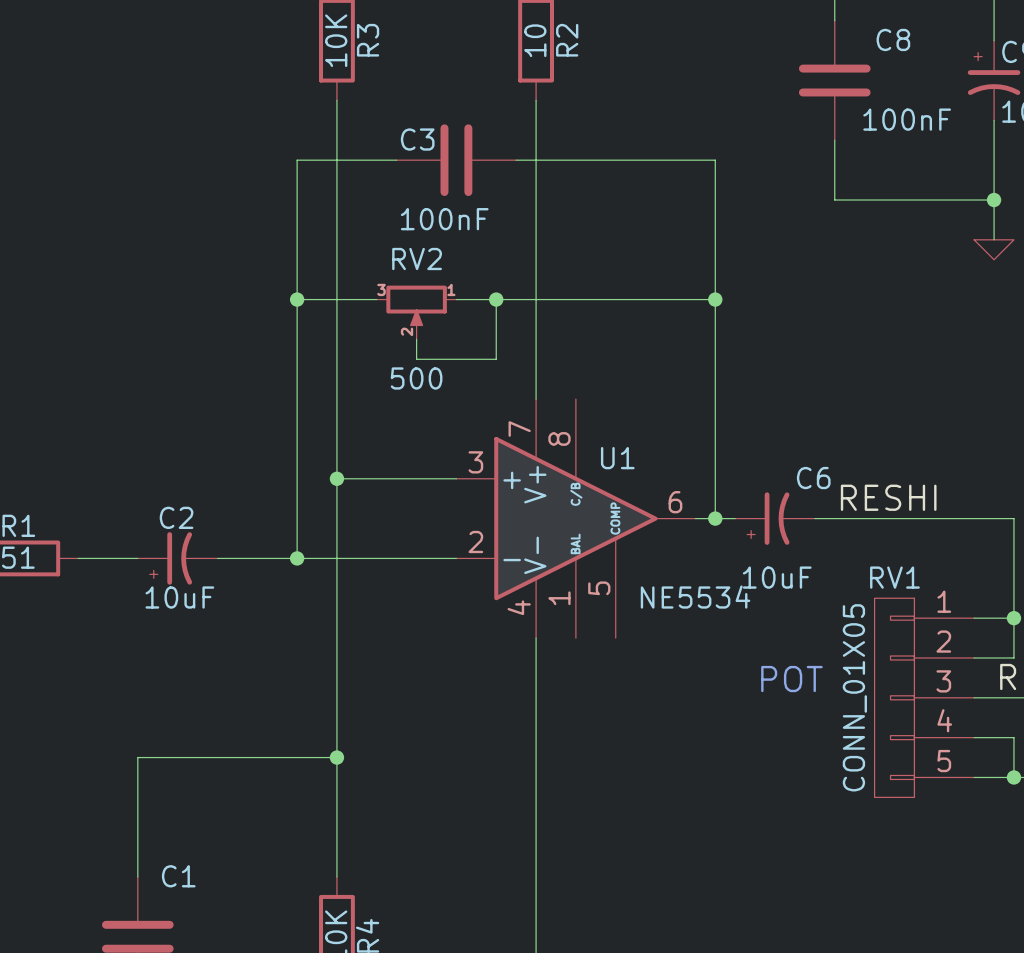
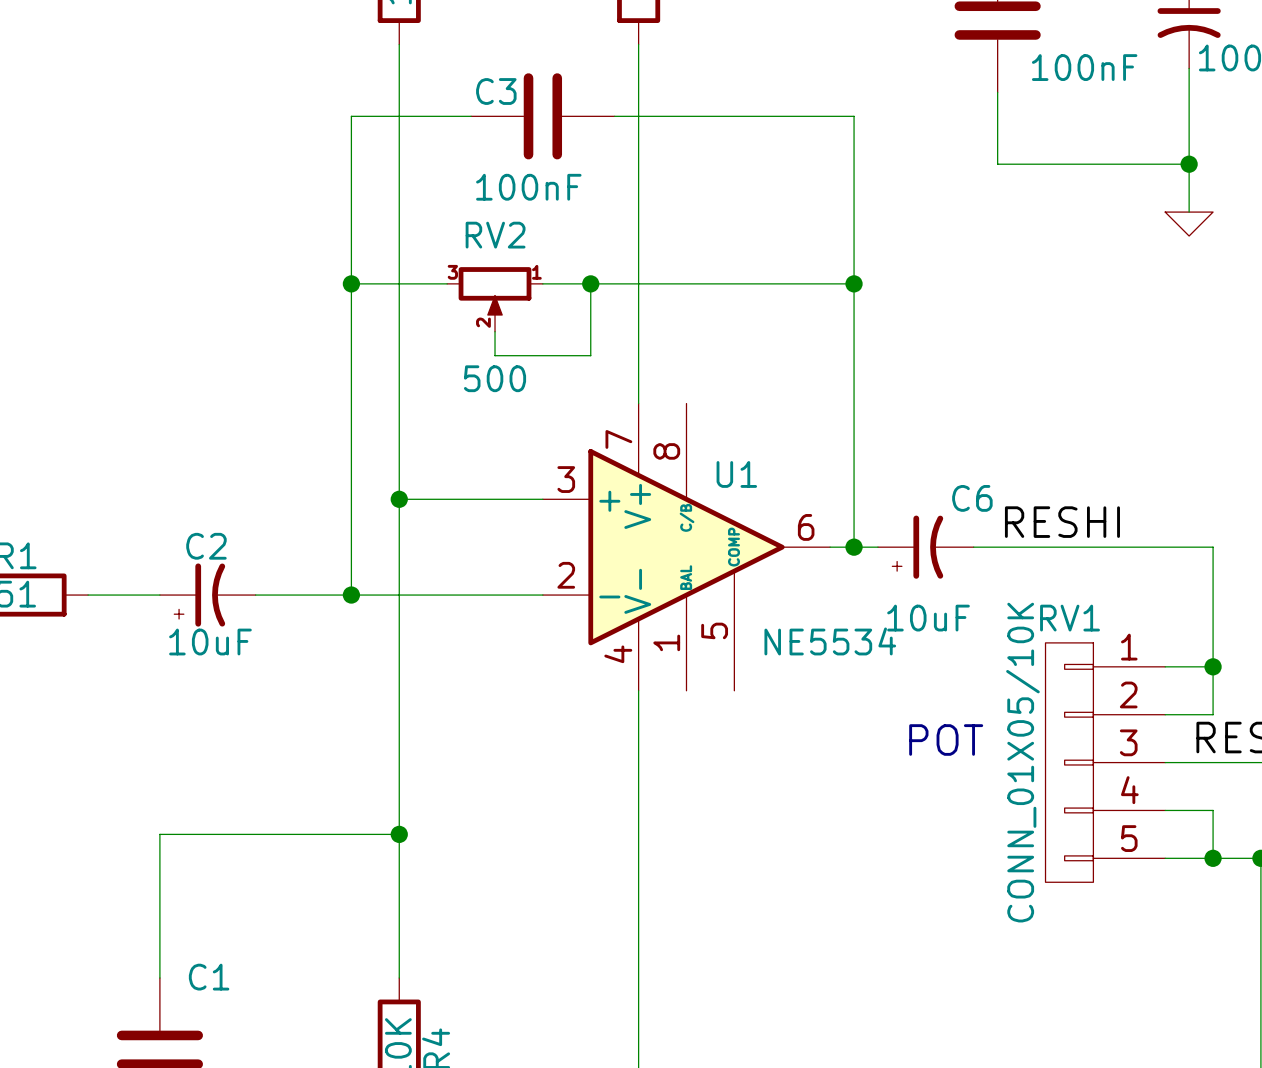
RV1 value: CONN_01X05 (854, 697) -> CONN_01X05/10K (1022, 762)

